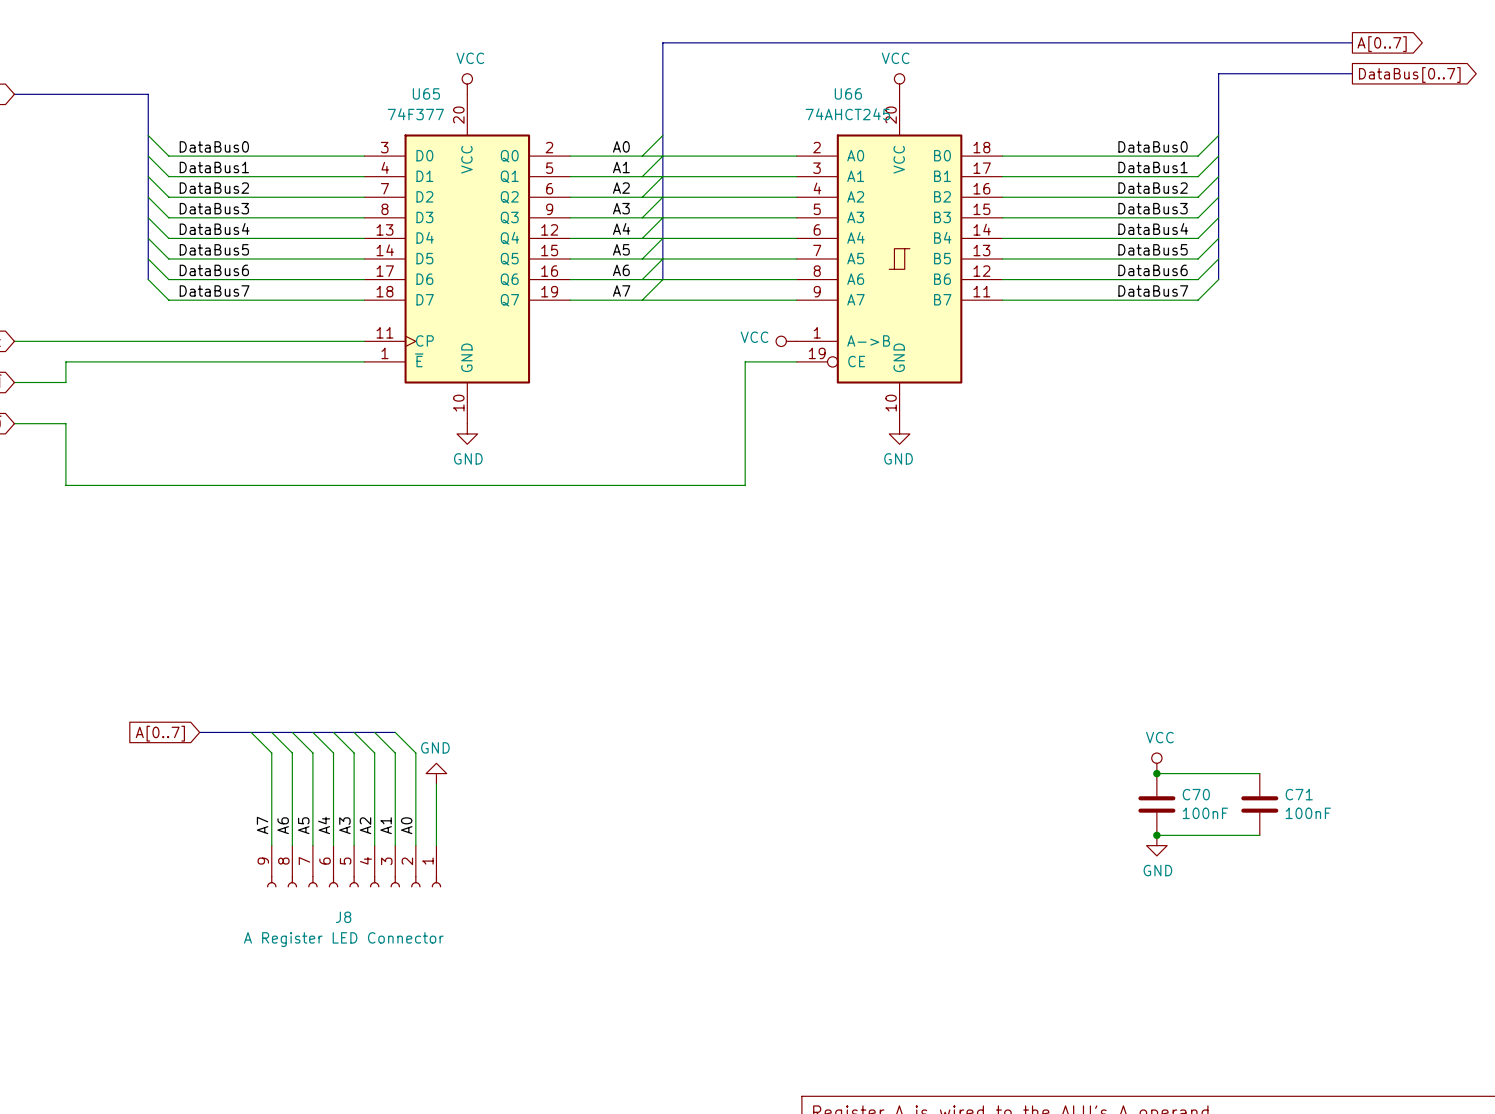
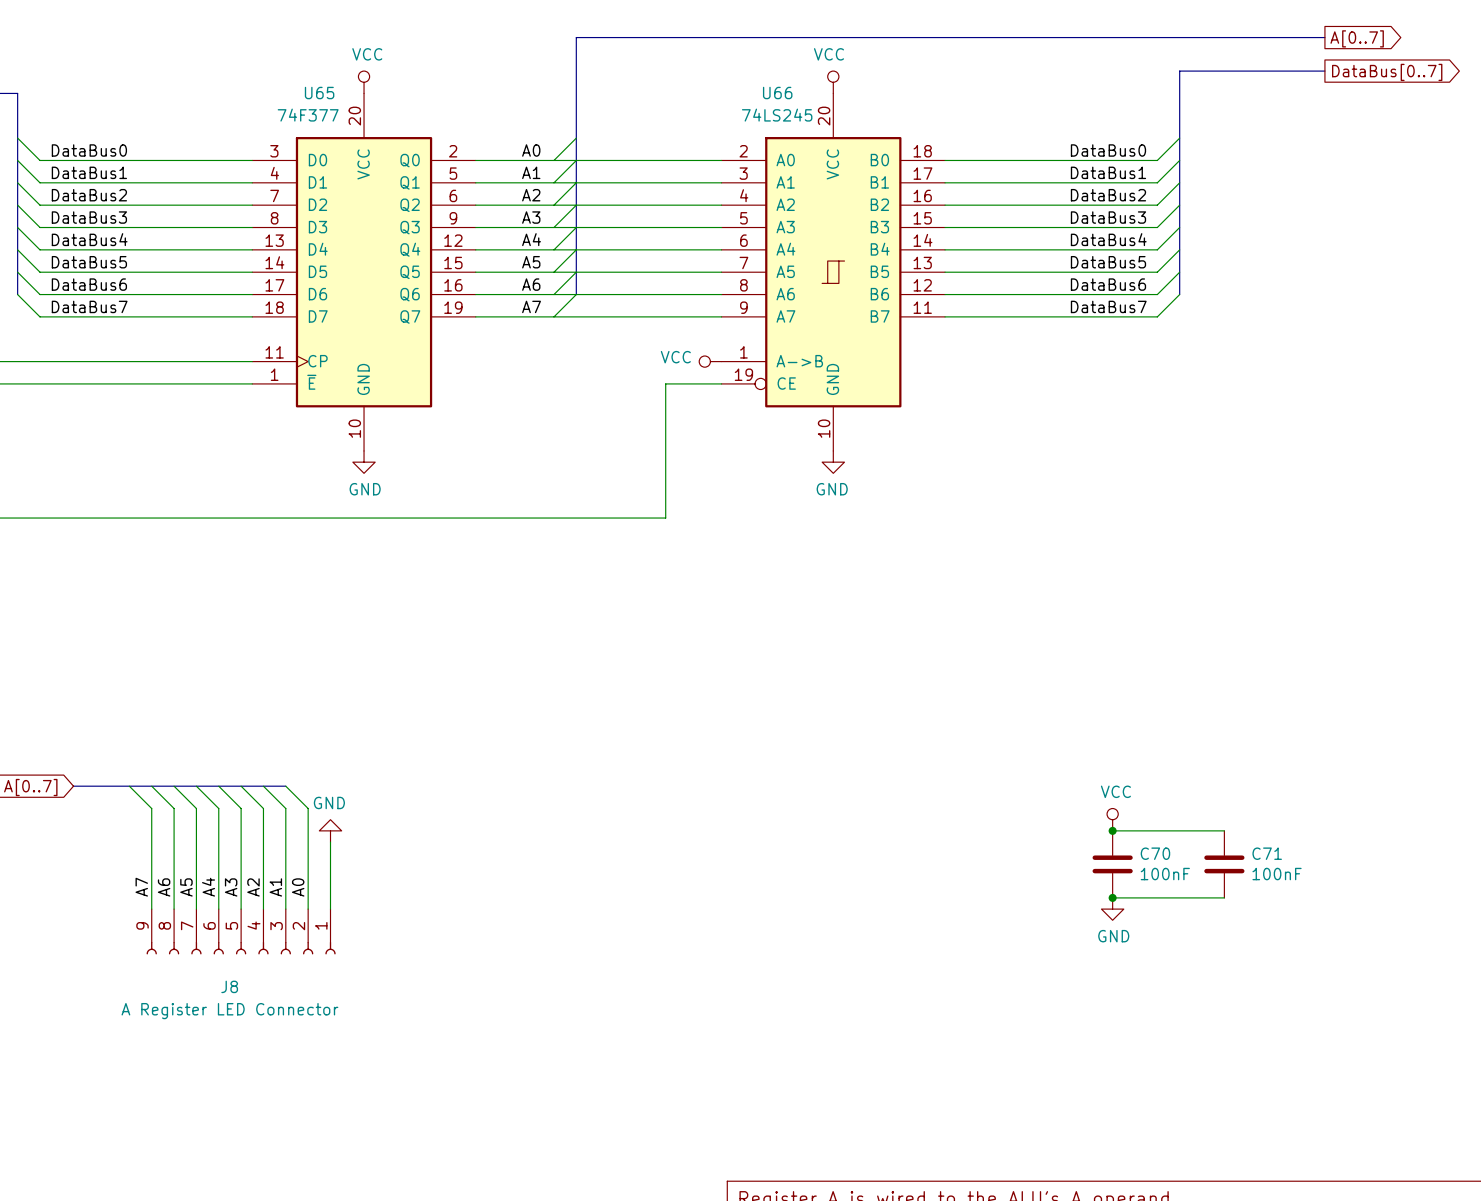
U66 value: 74AHCT245 (847, 114) -> 74LS245 (777, 115)

